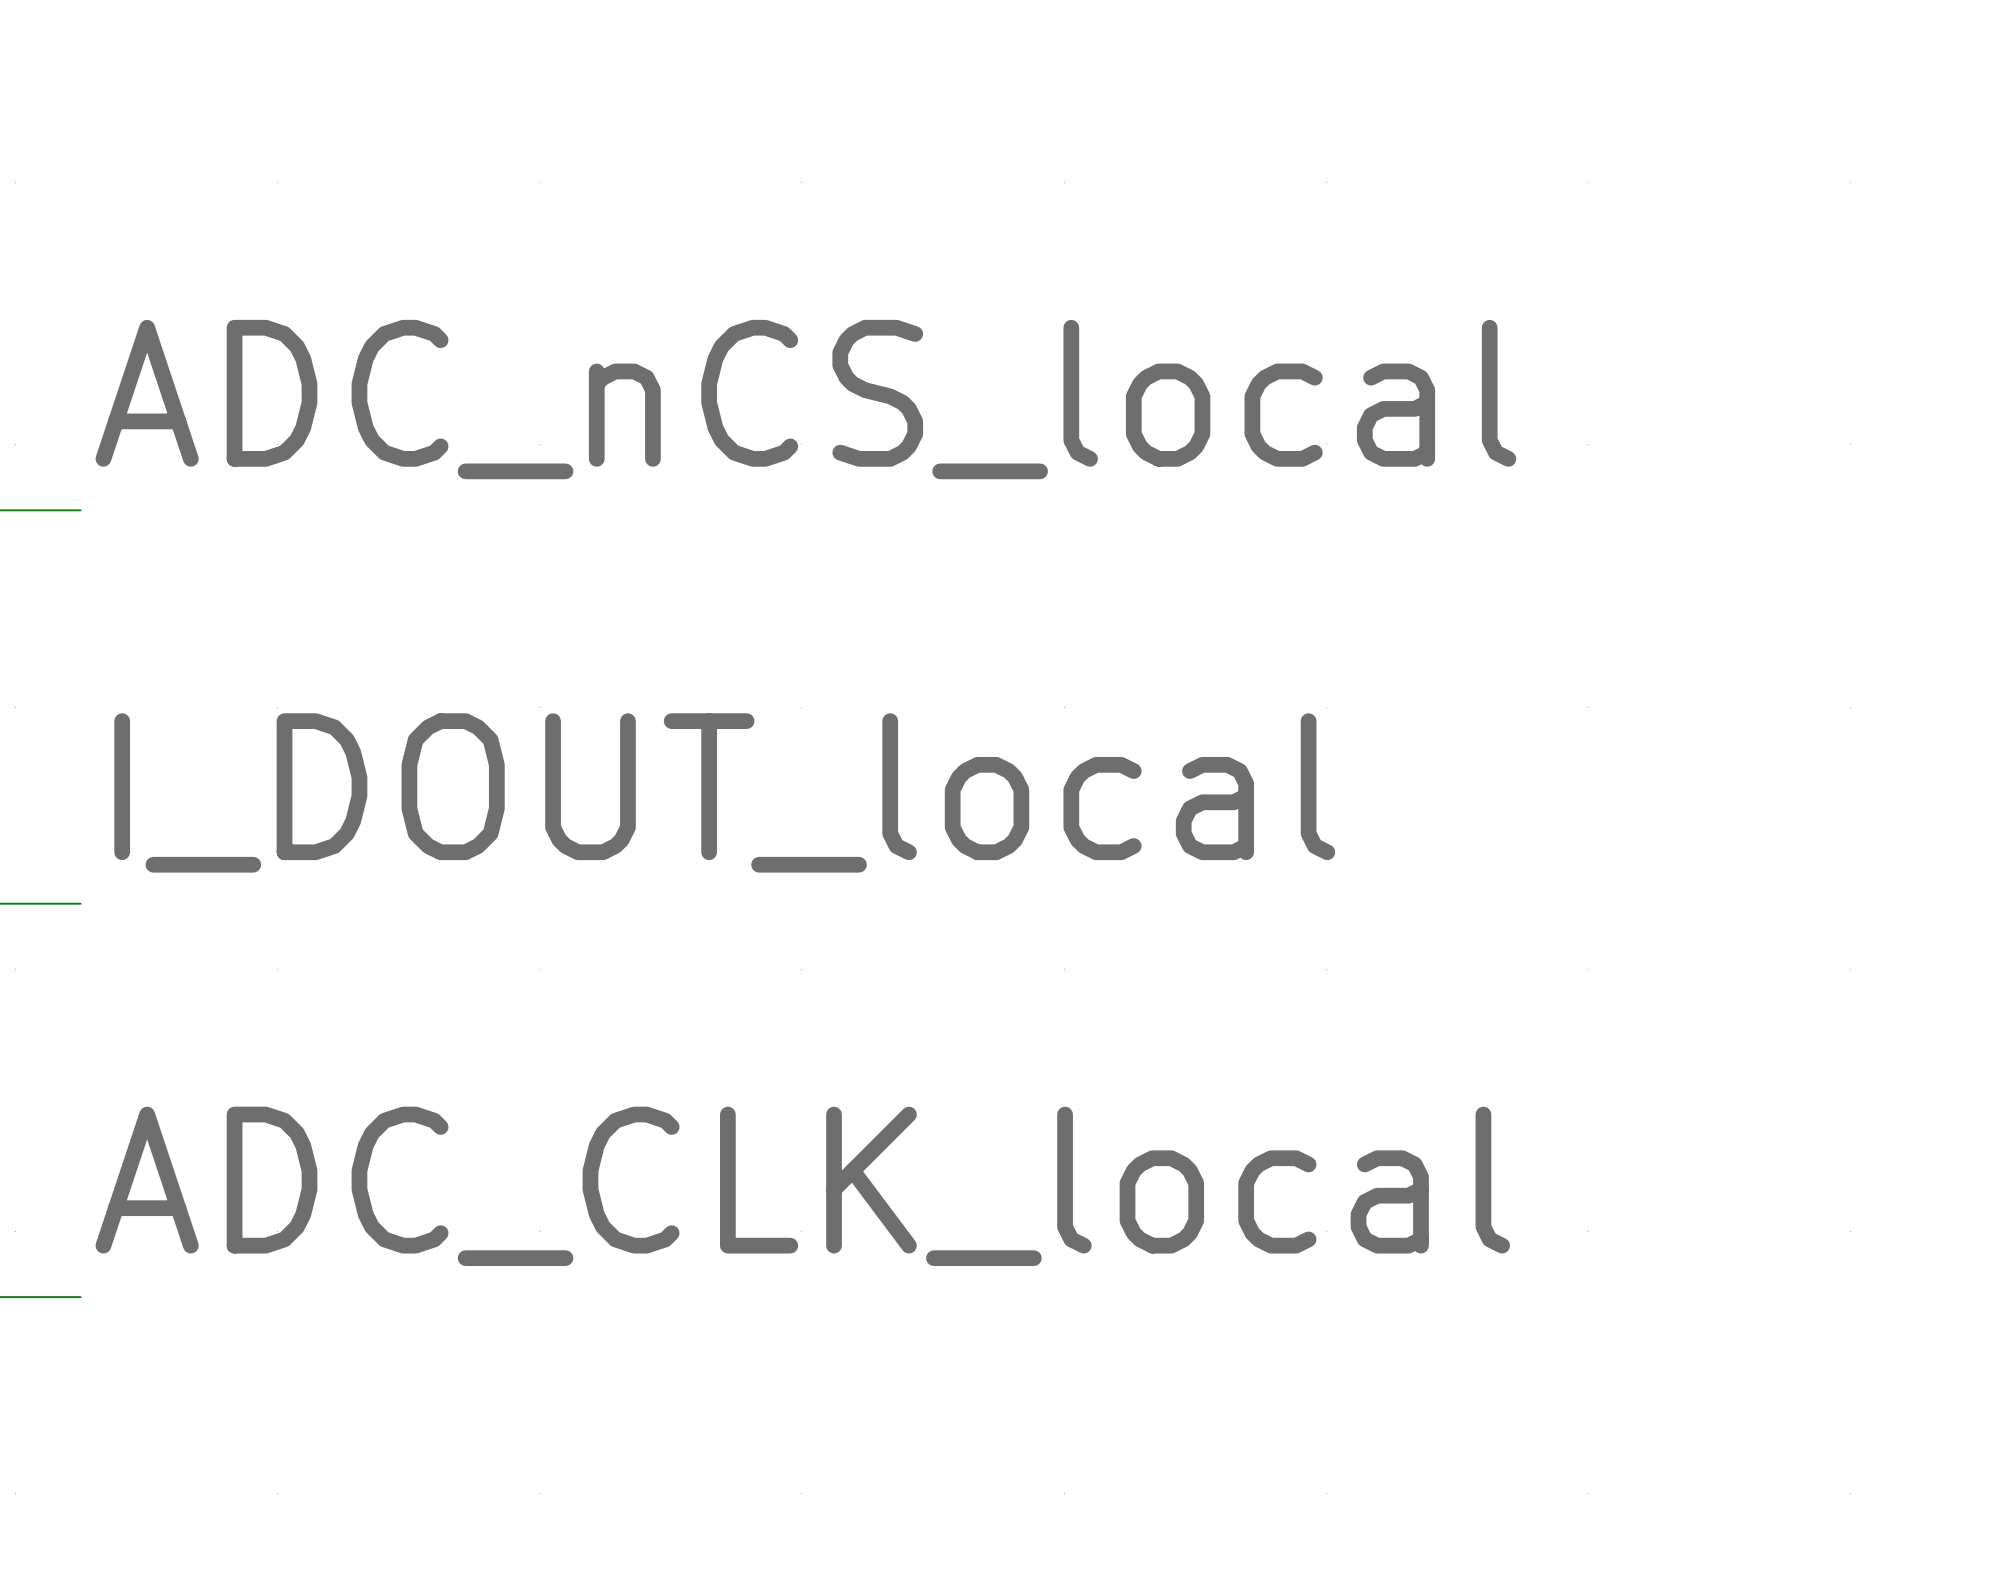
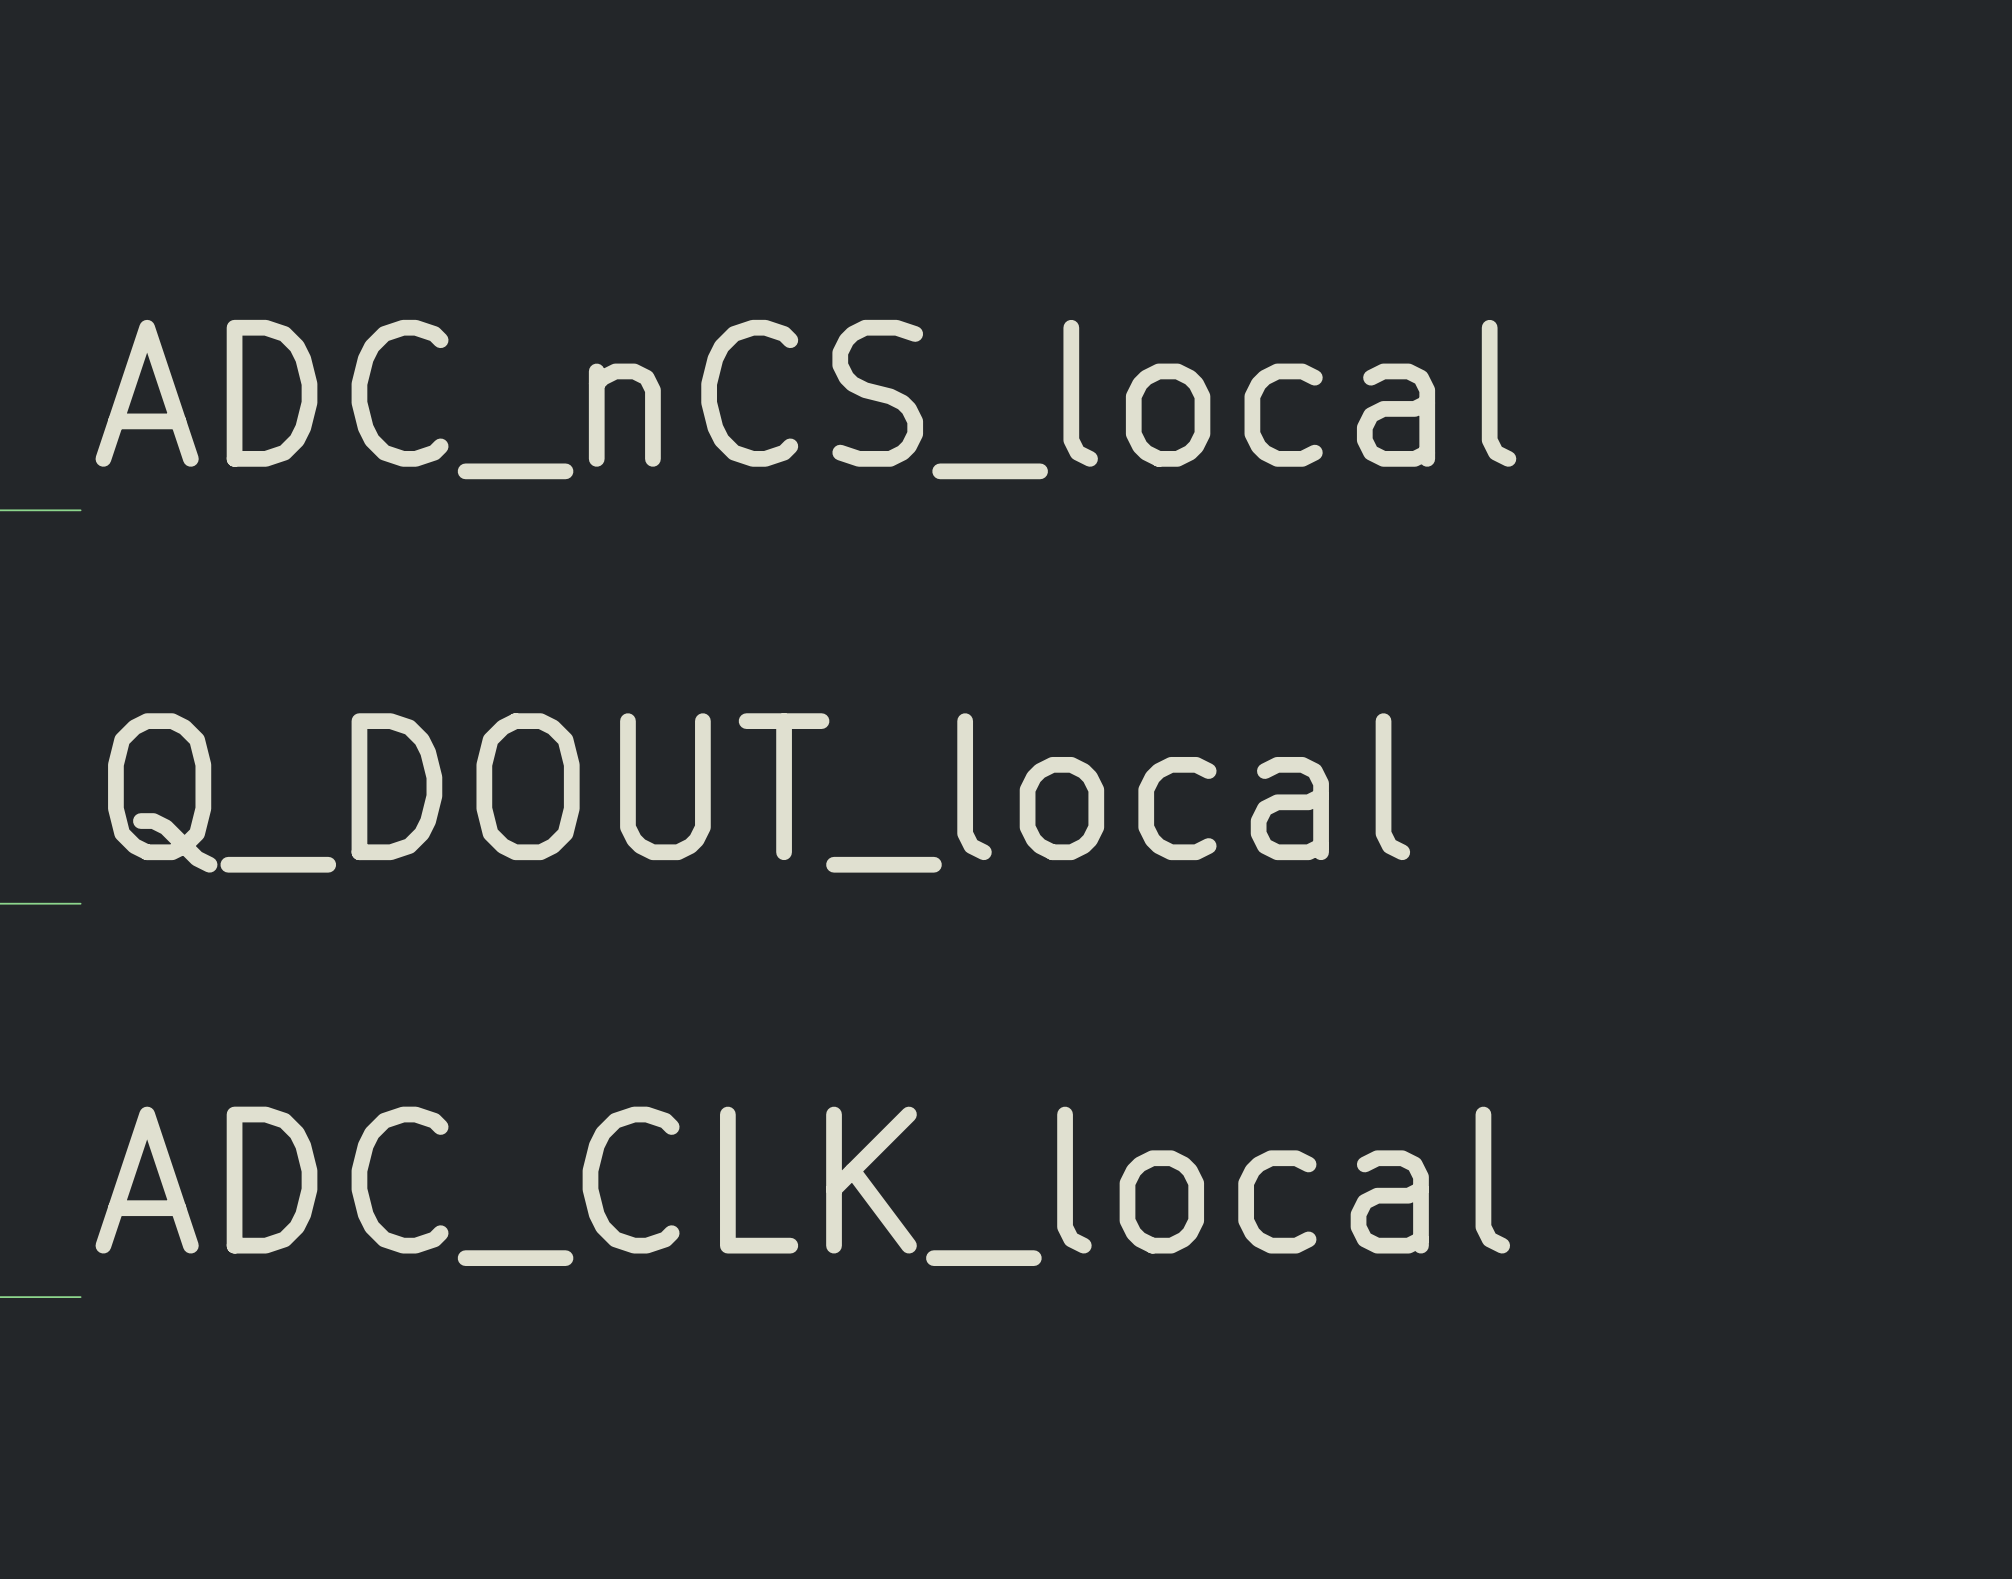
label: I_DOUT_local (724, 792) -> Q_DOUT_local (759, 792)

